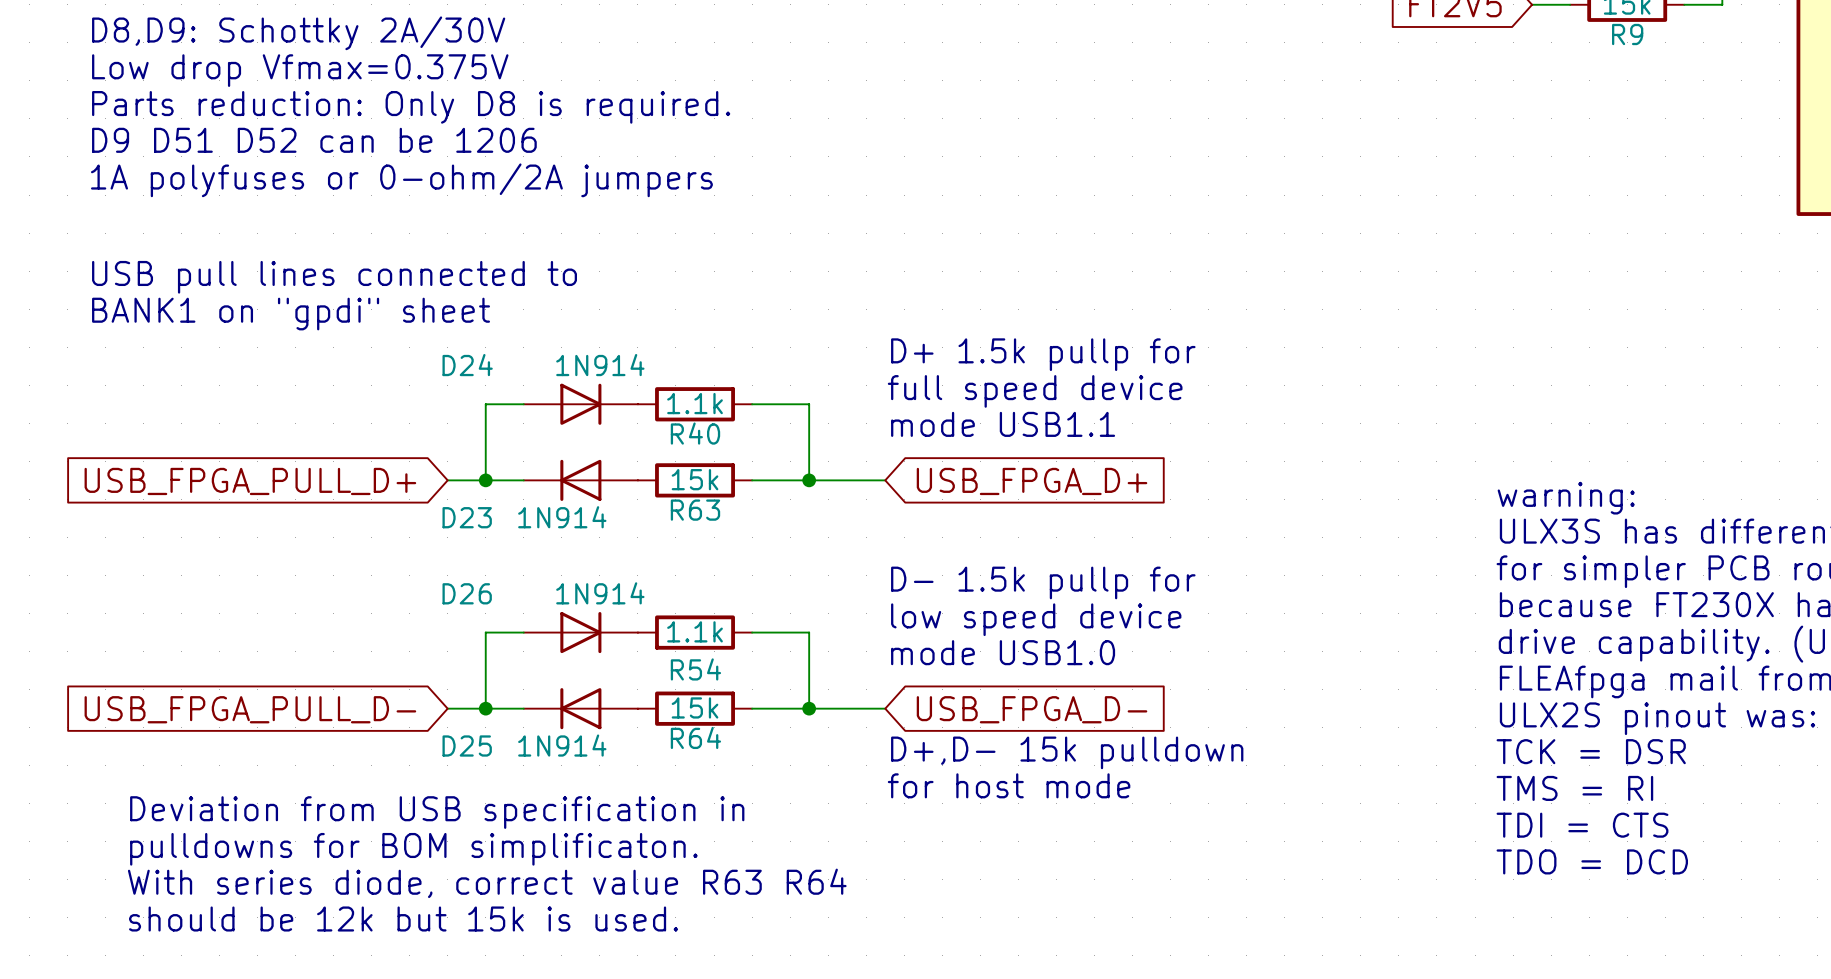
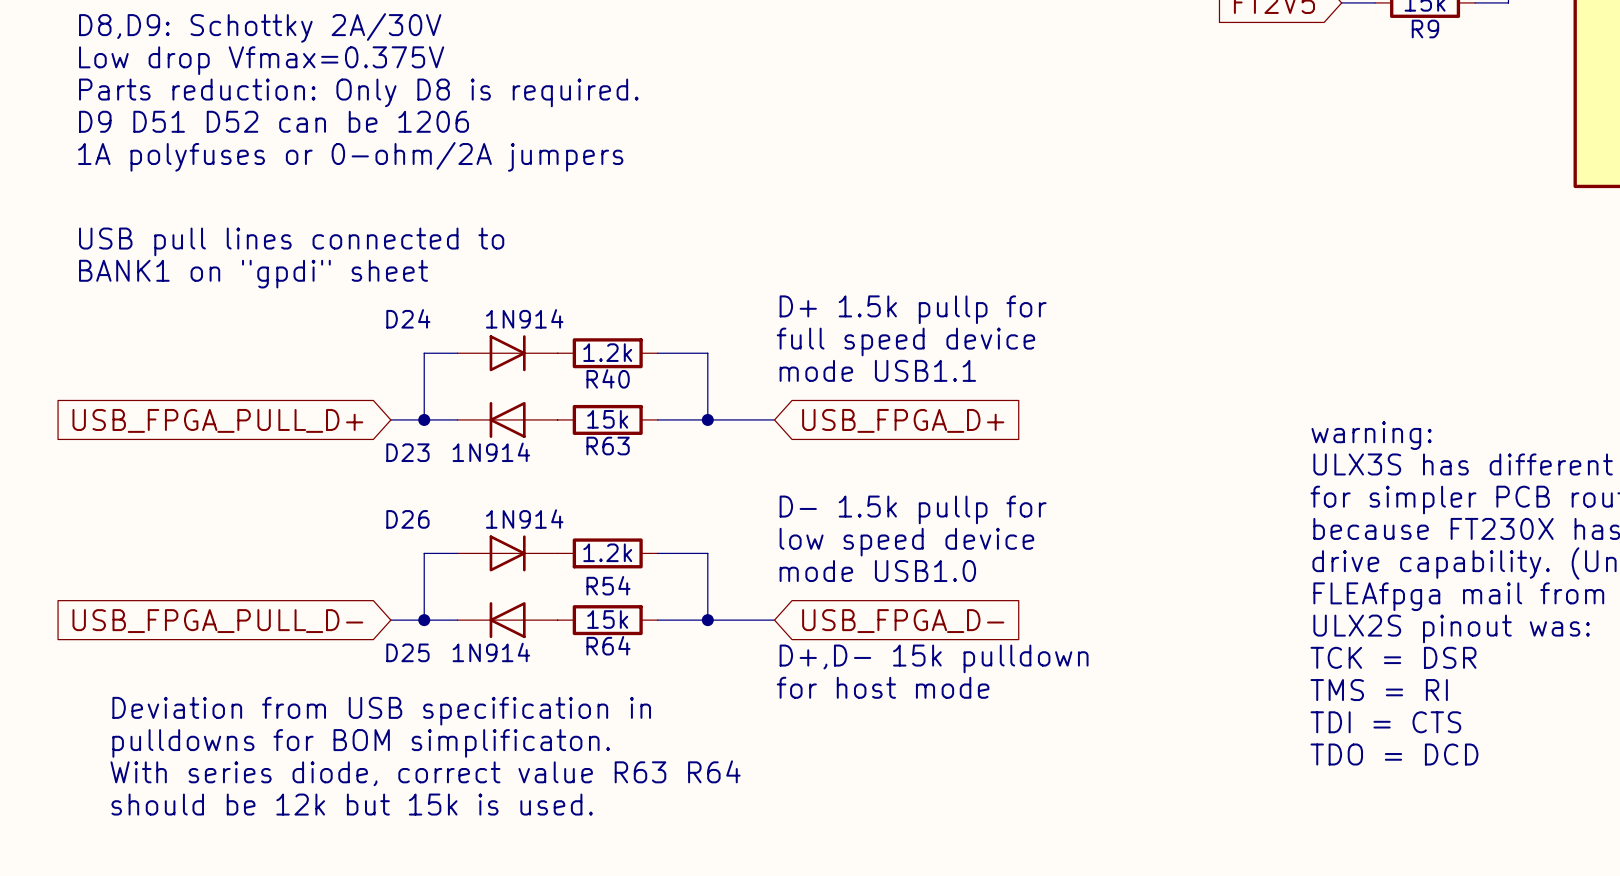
R40 value: 1.1k (695, 403) -> 1.2k (607, 352)
R54 value: 1.1k (695, 631) -> 1.2k (607, 552)

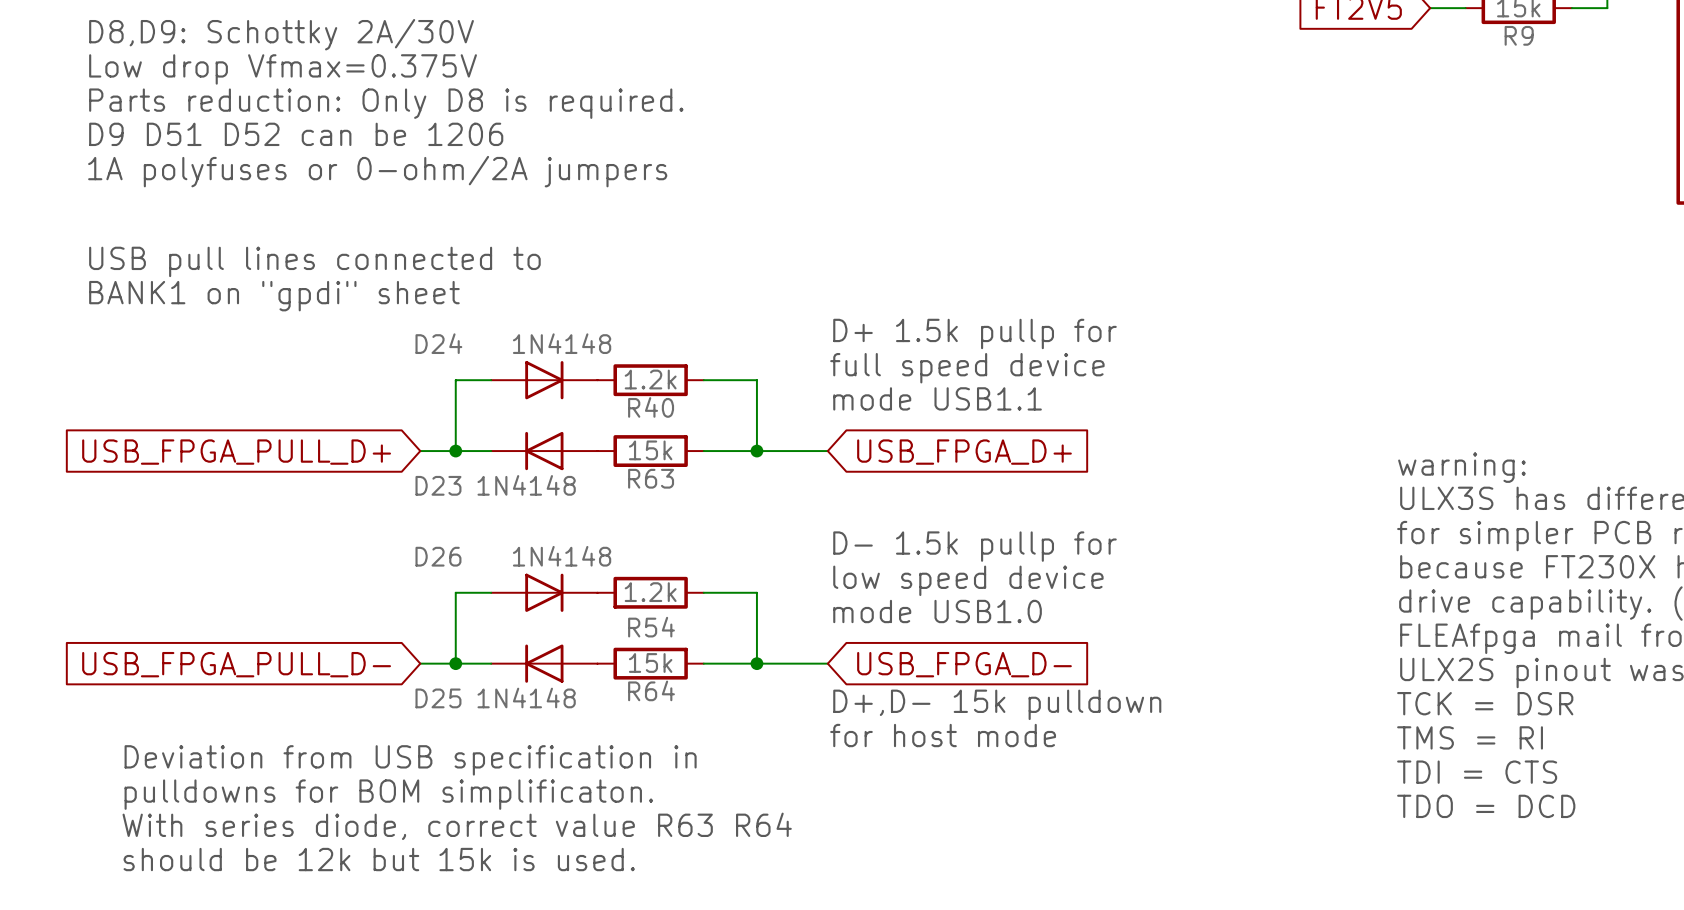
D24 value: 1N914 (524, 318) -> 1N4148 (562, 343)
D23 value: 1N914 (491, 452) -> 1N4148 (526, 485)
D26 value: 1N914 (524, 519) -> 1N4148 (562, 556)
D25 value: 1N914 (491, 652) -> 1N4148 (526, 698)

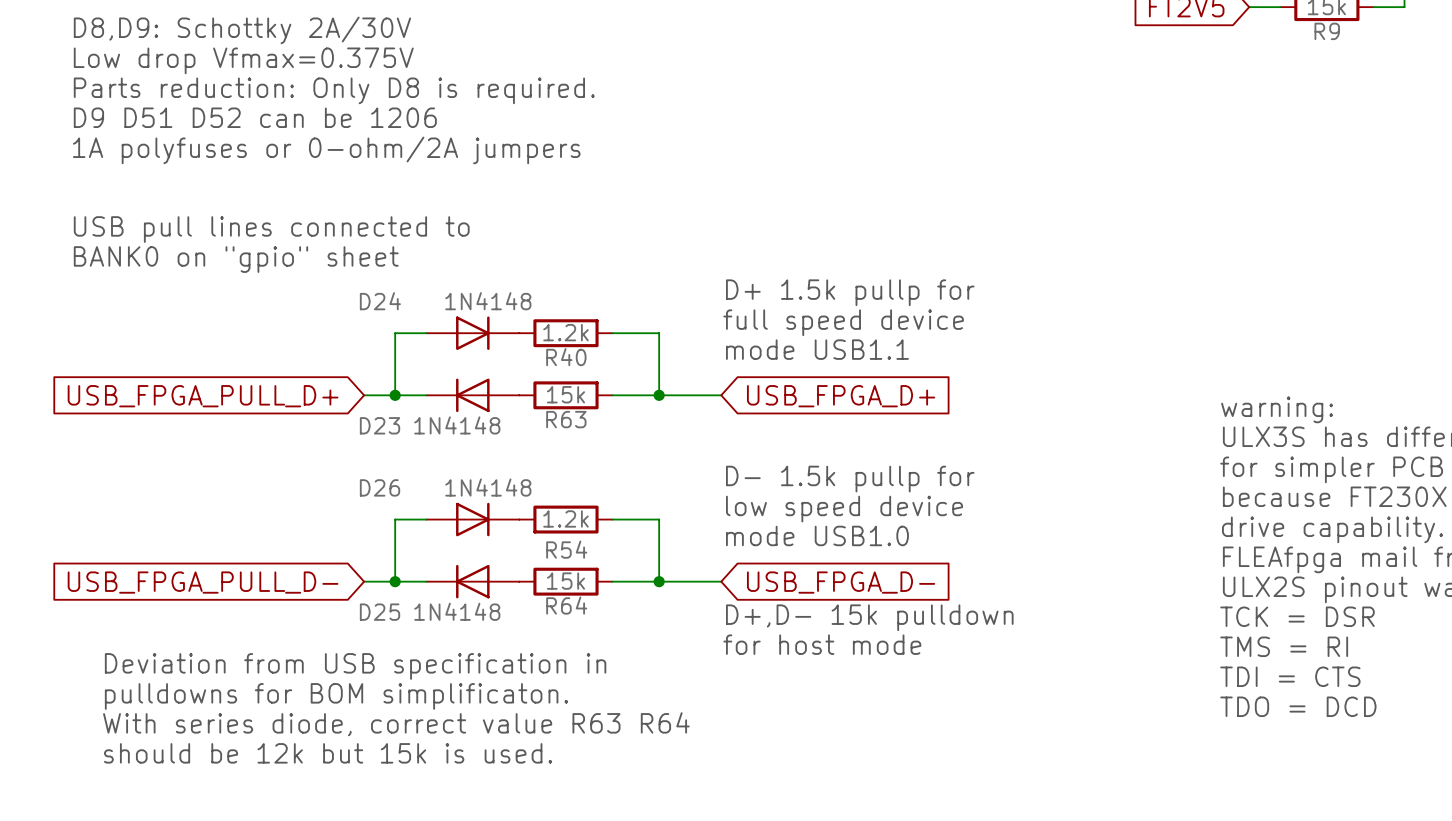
text: BANK1 on "gpdi" sheet (274, 296) -> BANK0 on "gpio" sheet (236, 259)

